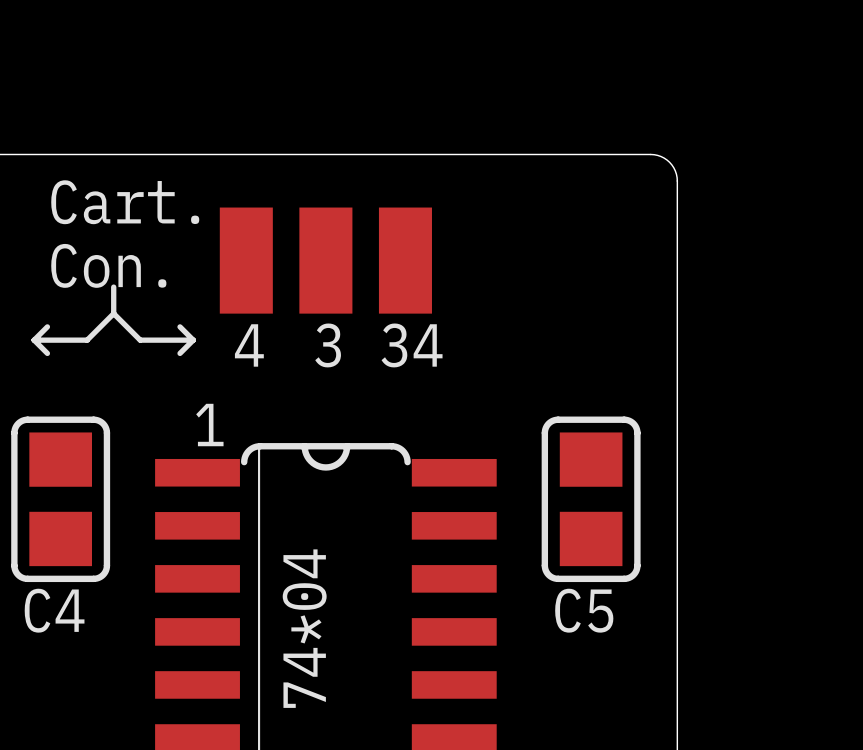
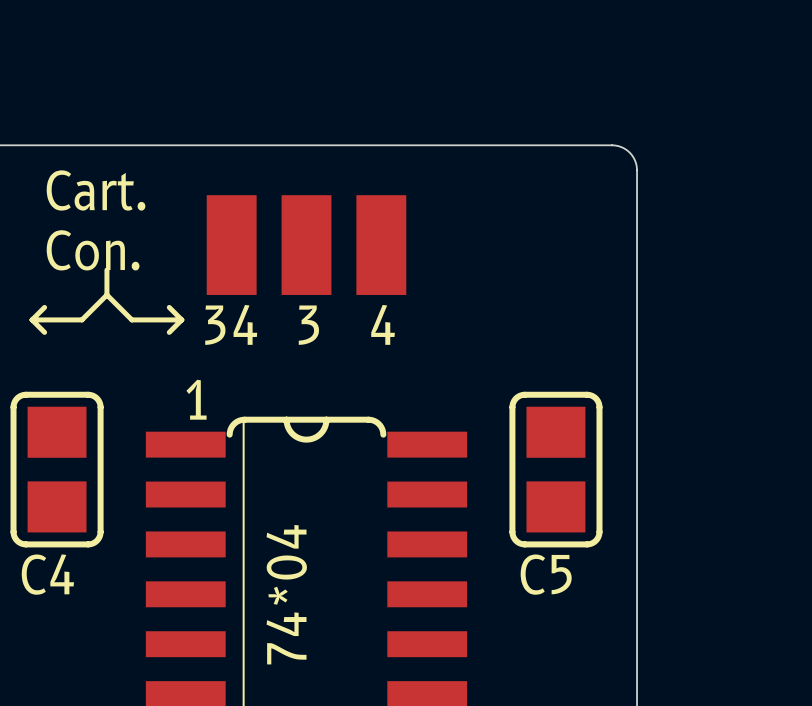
text: 4 (249, 345) -> 34 (231, 324)
text: 34 (412, 345) -> 4 (383, 324)

